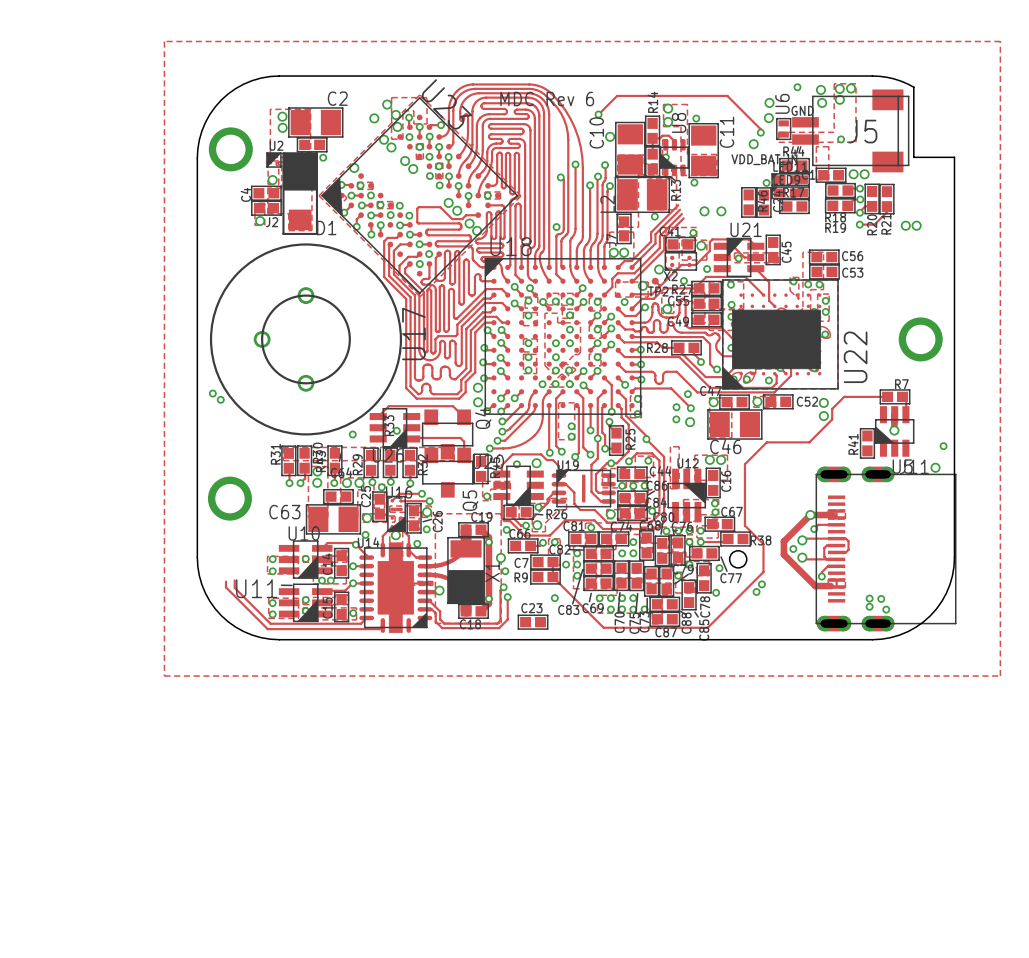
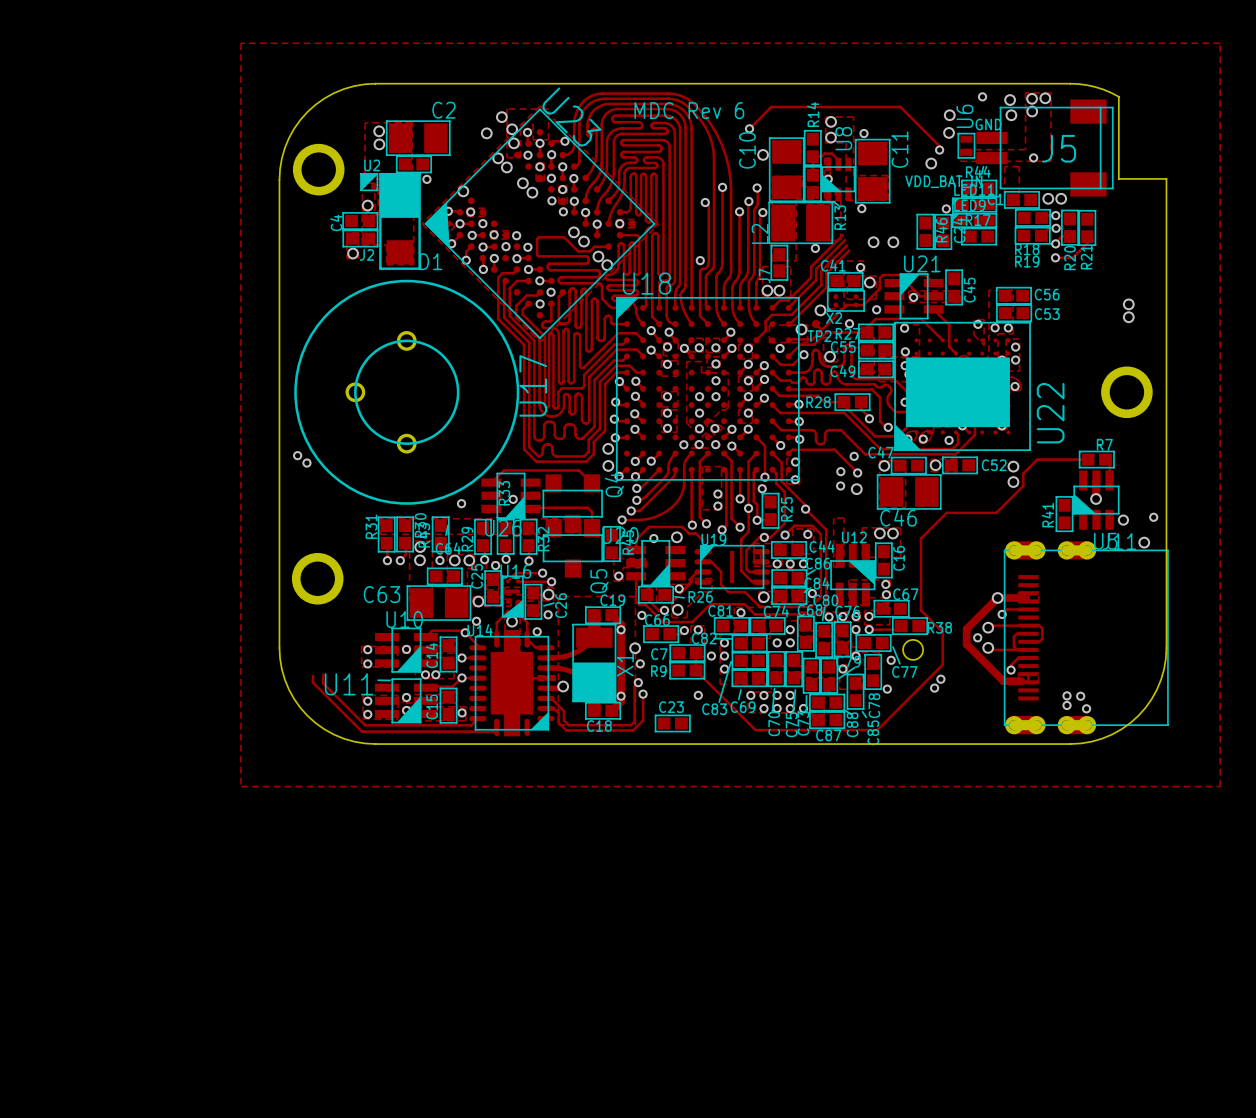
via: (905, 225) -> none
via: (916, 225) -> none
via: none -> (1128, 304)
via: none -> (1128, 317)
via: none -> (1123, 520)

